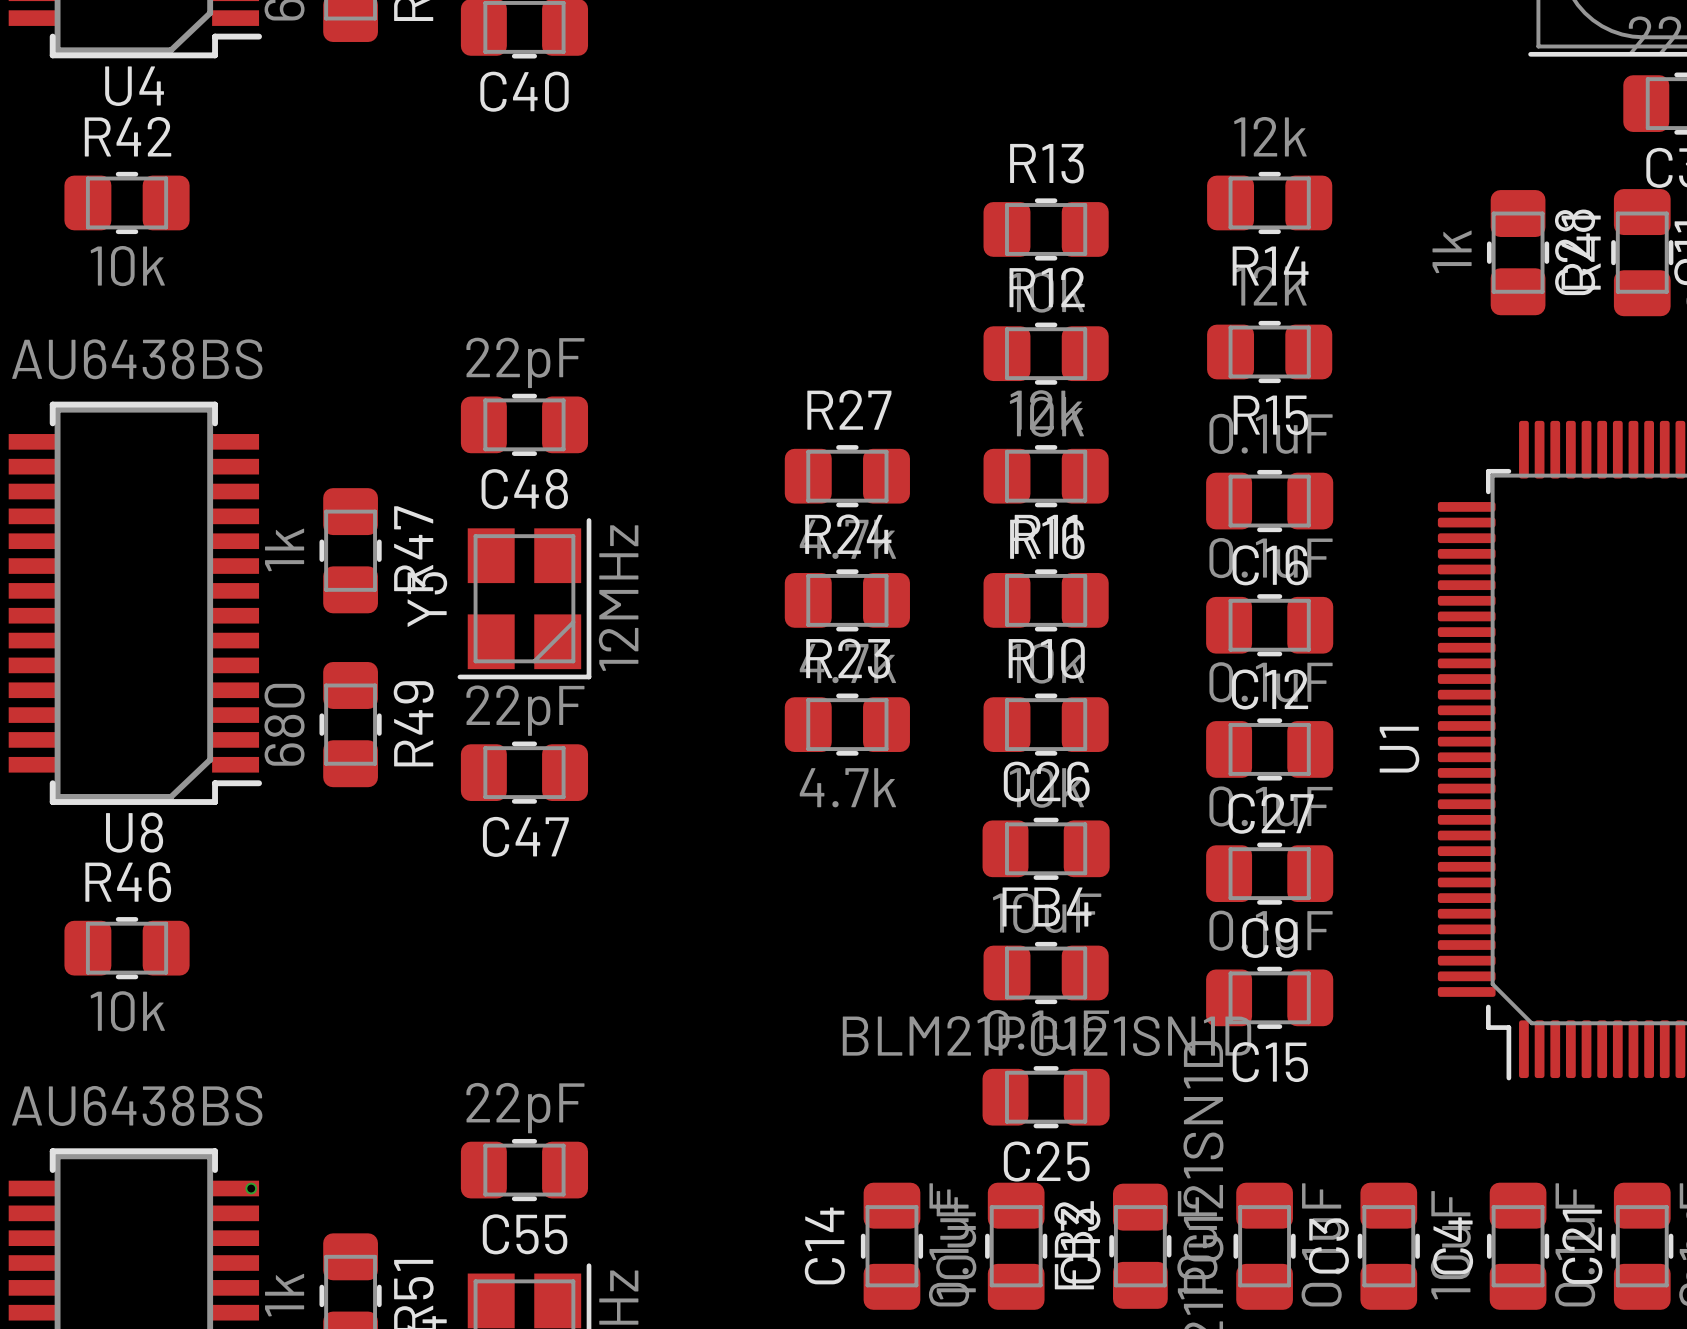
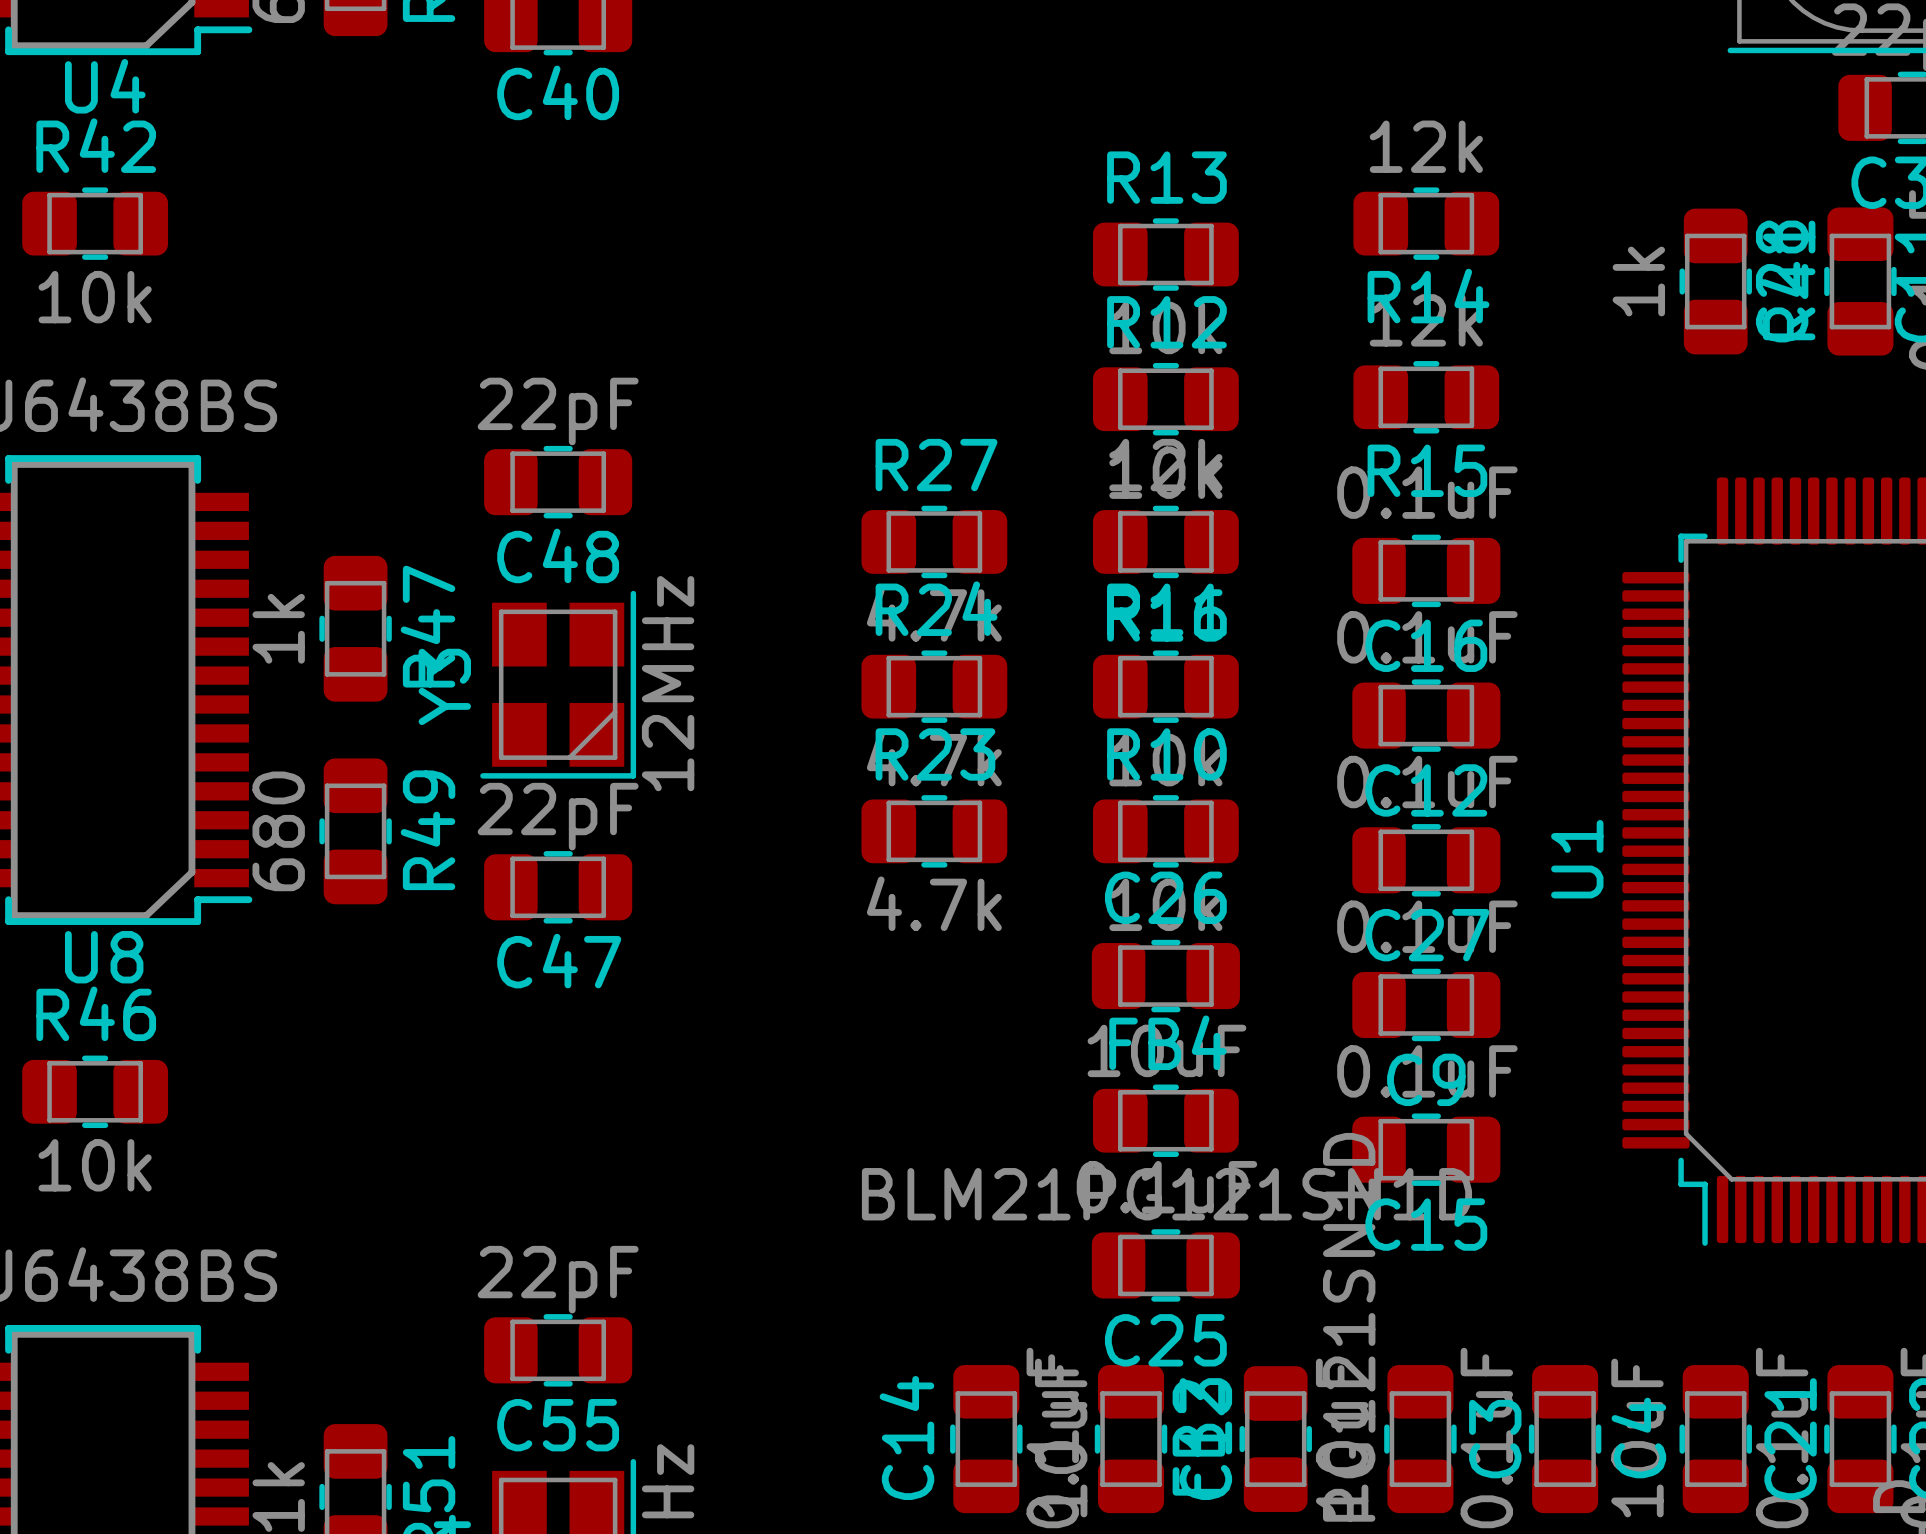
via: (251, 1188) -> none

